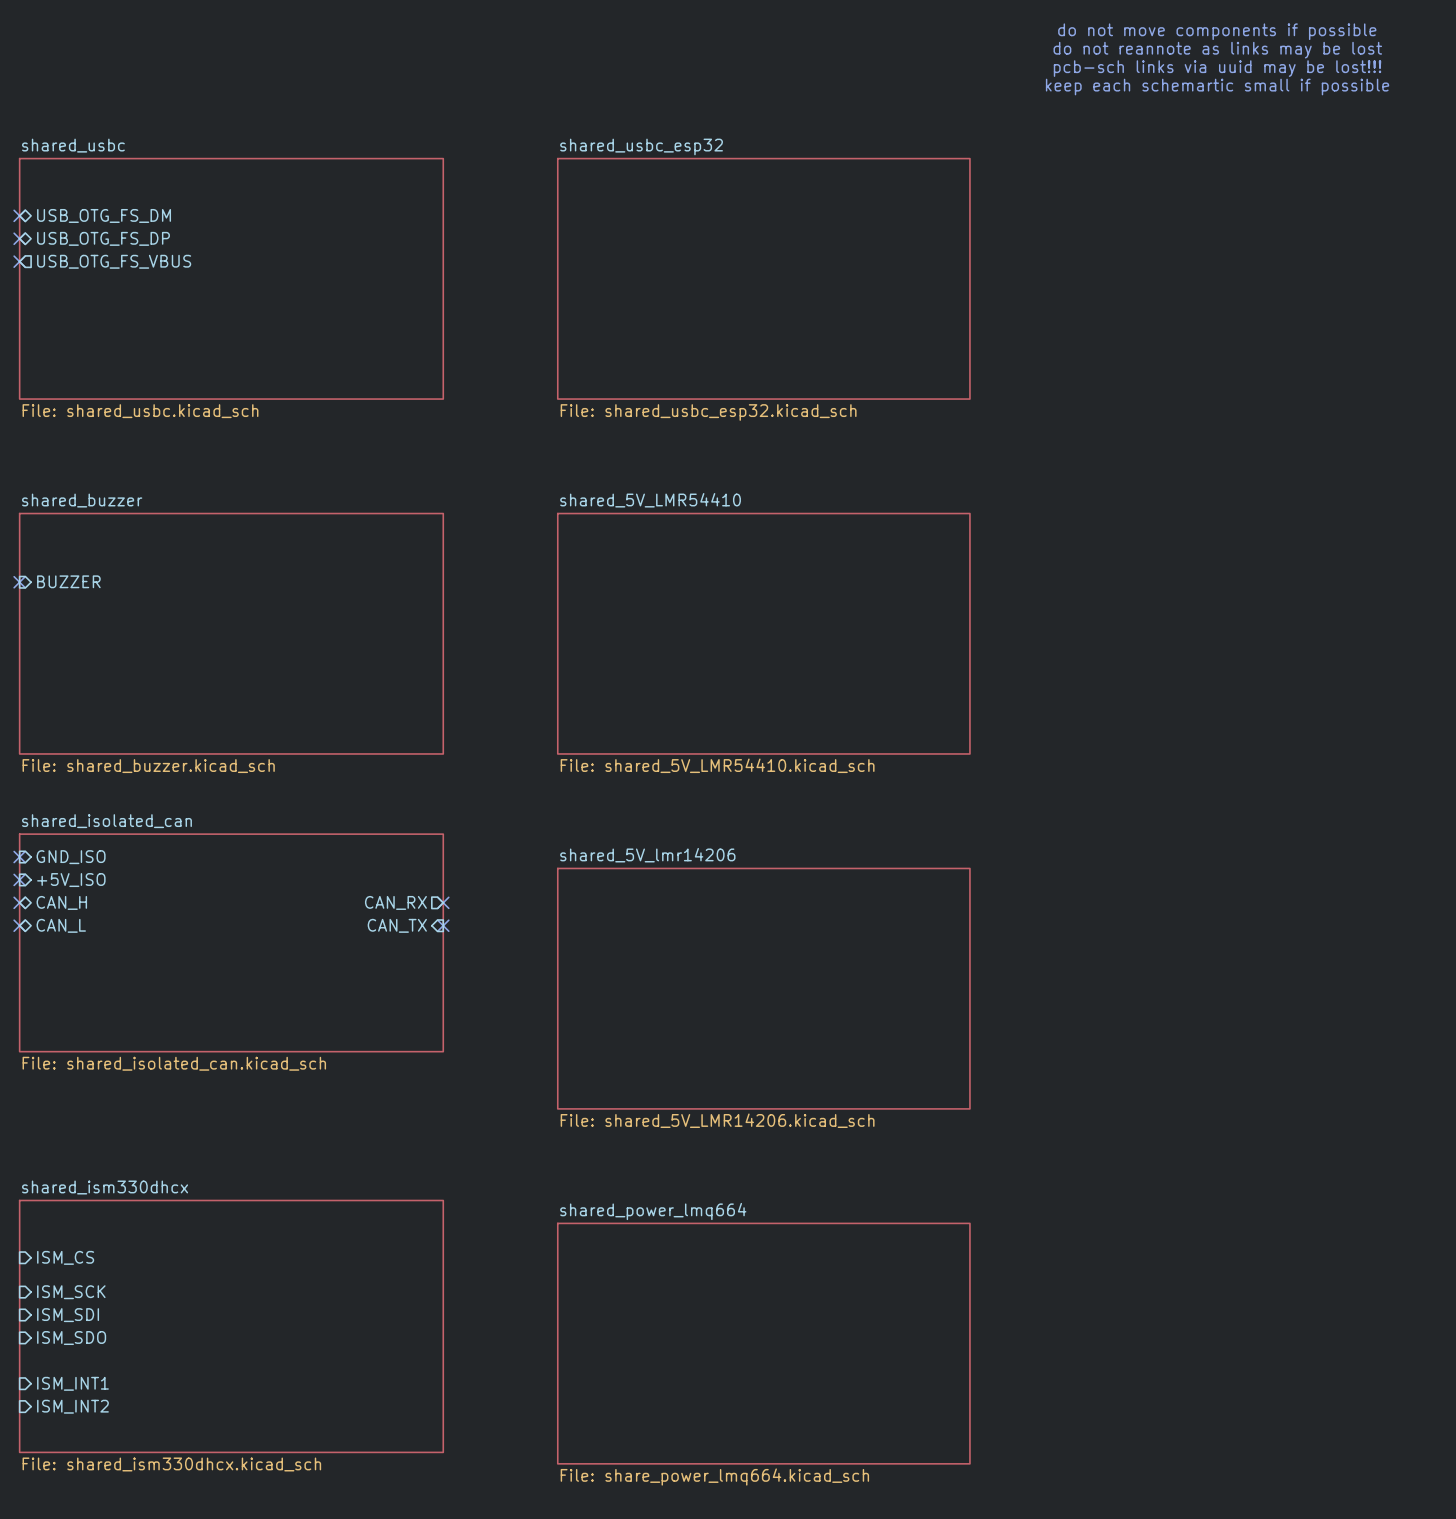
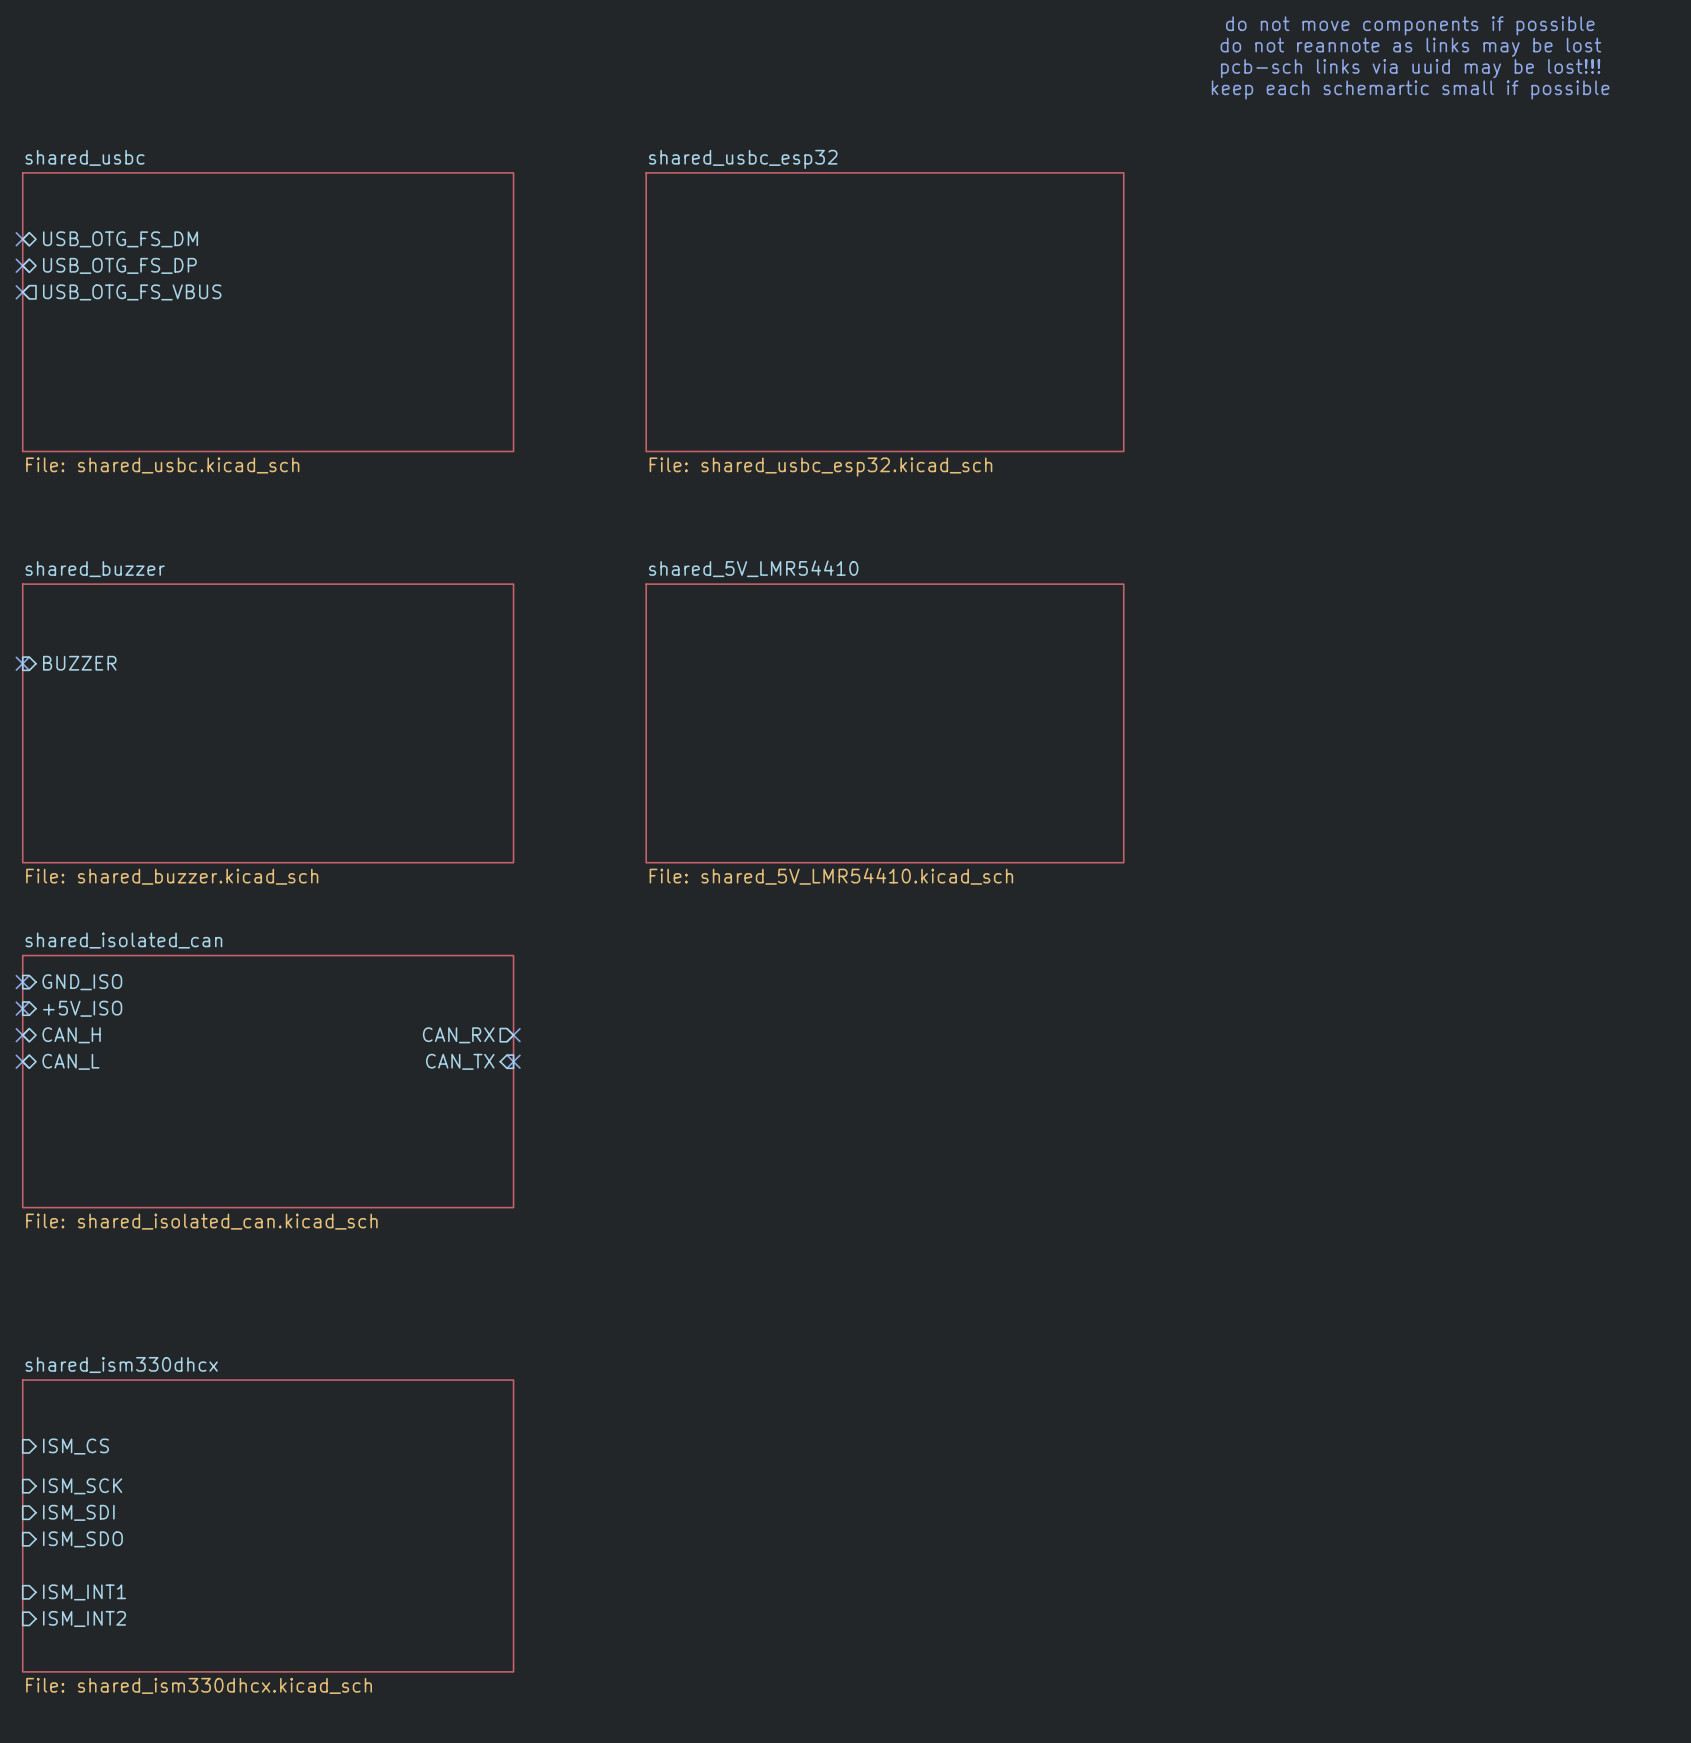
sheet shared_5V_lmr14206: File: shared_5V_LMR14206.kicad_sch (763, 988) -> none
sheet shared_power_lmq664: File: share_power_lmq664.kicad_sch (763, 1343) -> none

